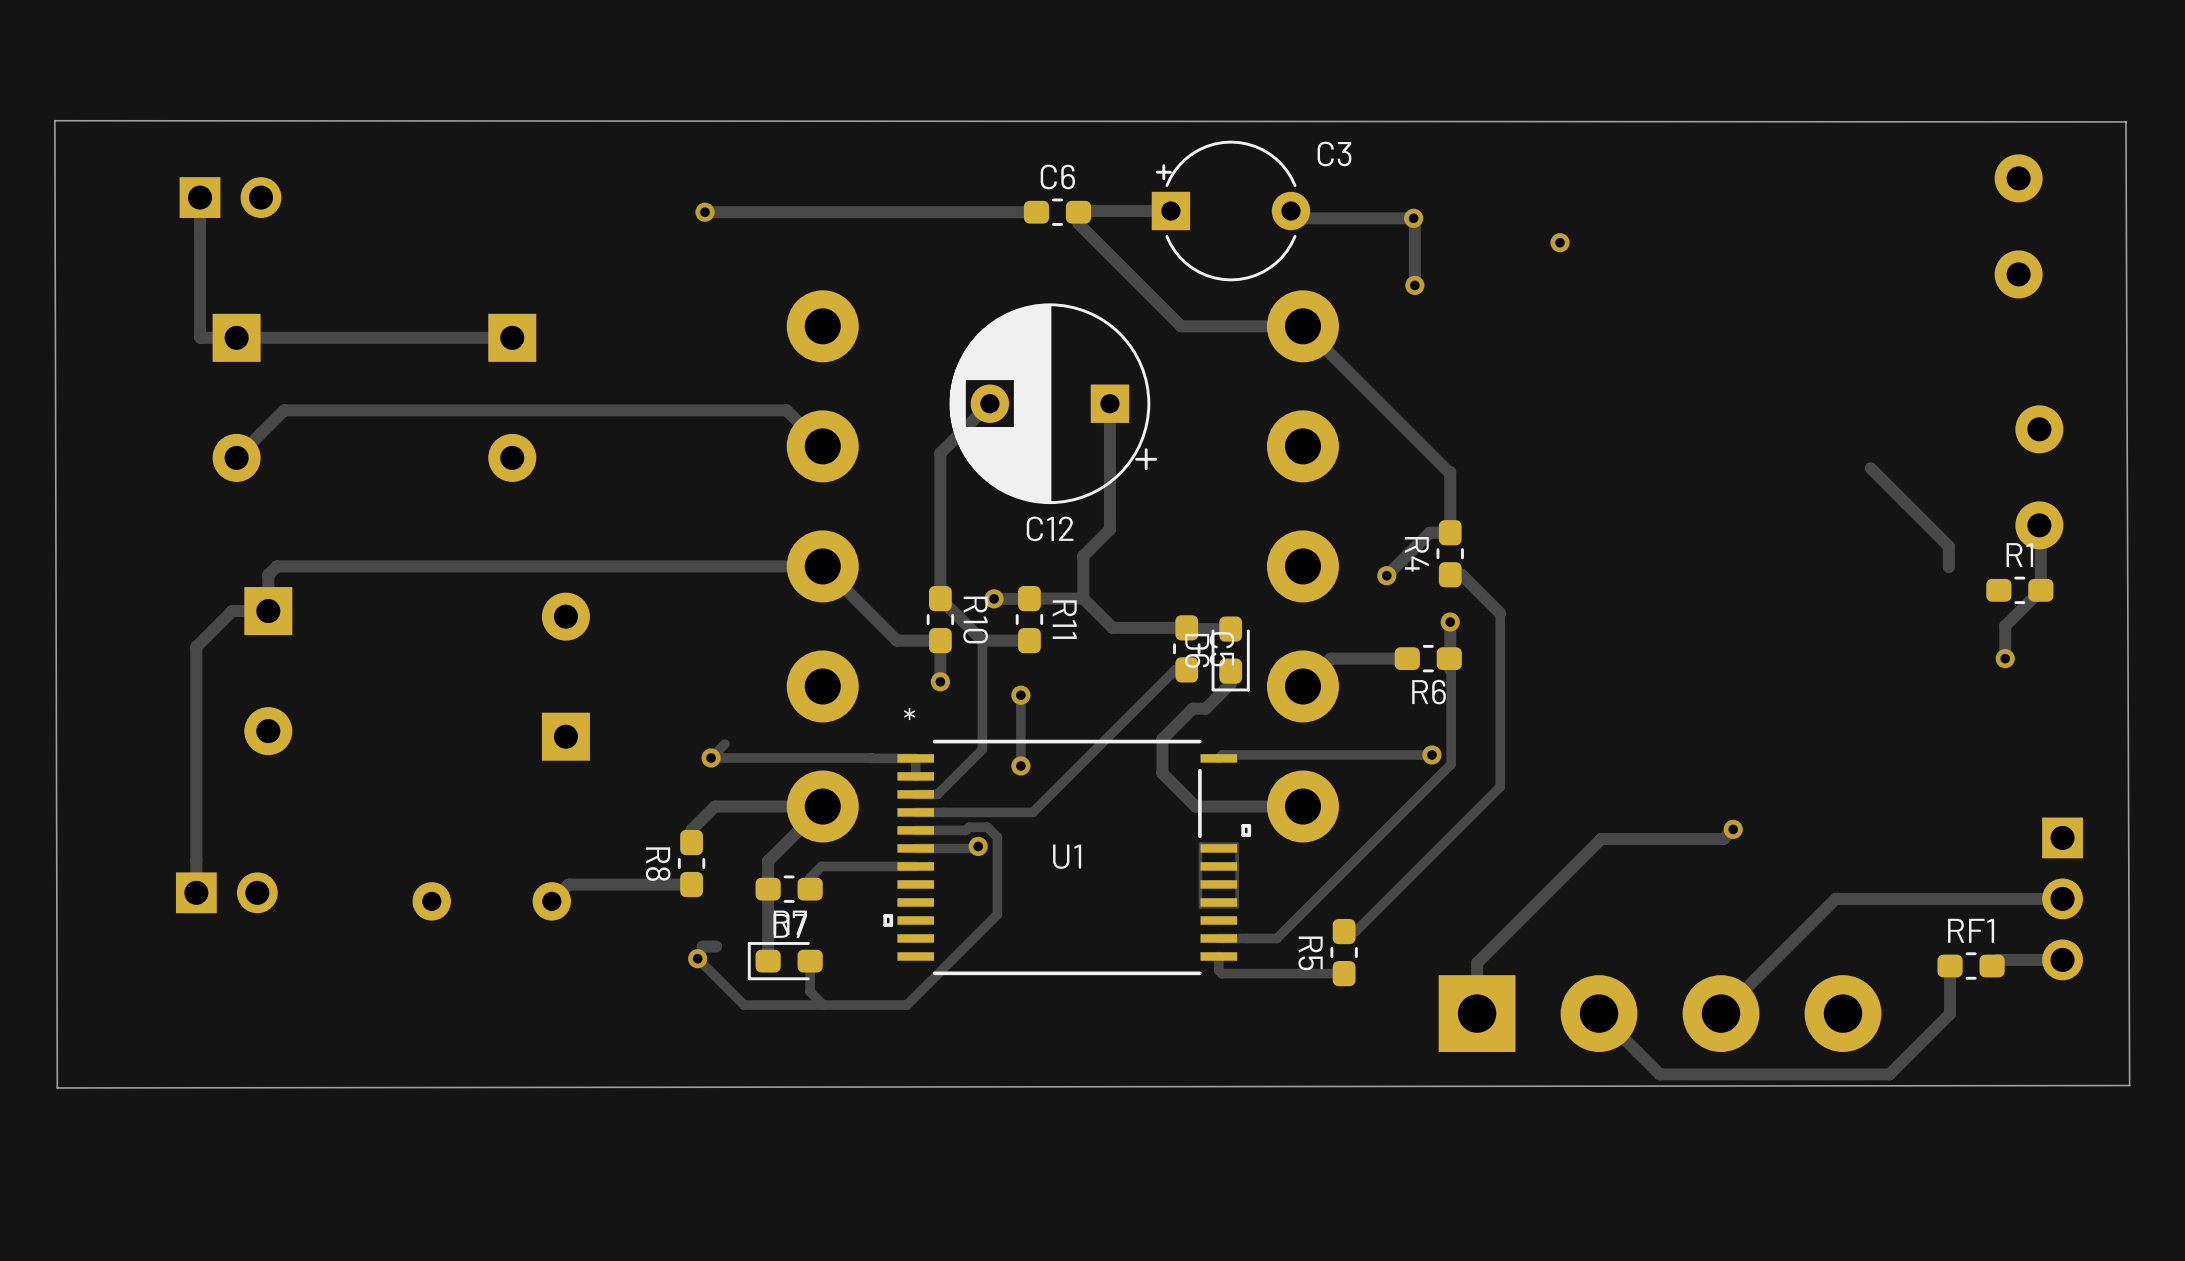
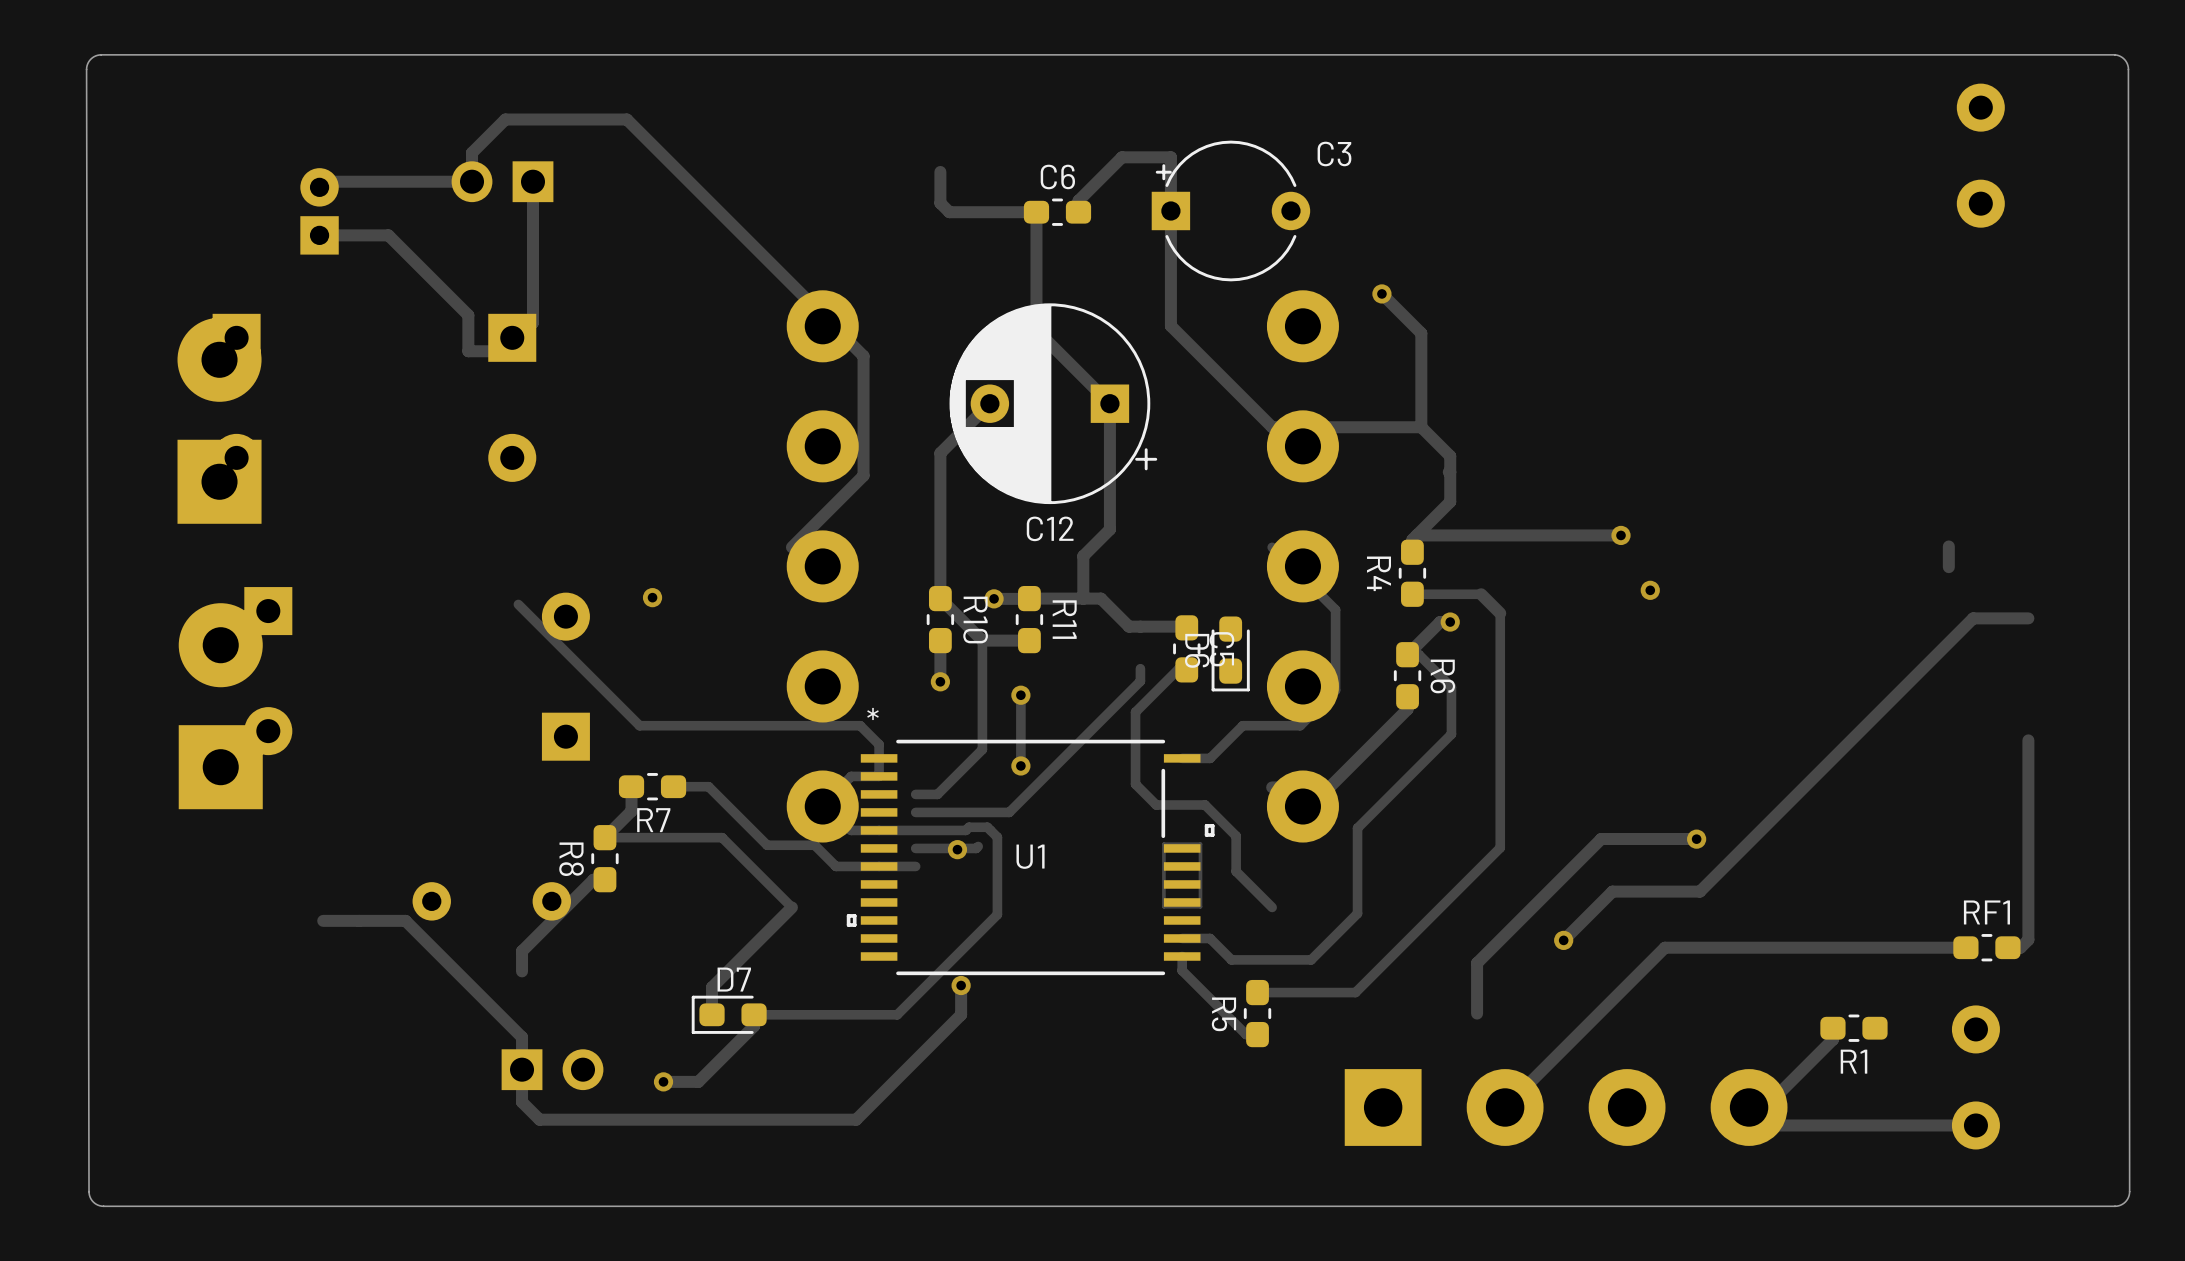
board edge: (54, 120) (57, 1087) (2129, 1085) (2125, 121) (54, 120) -> (2114, 54) (2124, 59) (2128, 69) (2129, 1191) (2127, 1198) (2122, 1204) (2114, 1206) (103, 1206) (96, 1204) (90, 1198) (89, 1191) (86, 69) (88, 62) (93, 56) (101, 54) (2114, 54)
track: none -> (533, 181) (533, 322) (504, 351) (468, 351) (468, 315) (388, 235) (319, 235)
track: none -> (319, 187) (325, 181) (472, 181) (472, 152) (505, 119) (626, 119) (863, 356) (863, 475) (791, 547)
track: (200, 197) (200, 337) (512, 337) -> none
part rotation: 0° (230, 197) -> 180° (502, 181)
part position: (230, 197) -> (502, 181)
track: (1170, 210) (1079, 210) -> none
track: (1290, 210) (1298, 218) (1413, 218) (1414, 285) -> none
part: none -> (319, 211)
via: (704, 212) -> none
track: (949, 212) (704, 212) -> (949, 212) (940, 203) (940, 171)
track: none -> (1036, 212) (1036, 330) (1109, 403)
track: (1078, 212) (1078, 223) (1181, 326) (1302, 326) (1448, 472) -> (1078, 212) (1078, 200) (1121, 157) (1170, 157) (1170, 326) (1272, 427) (1421, 427)
via: (1413, 218) -> none
part position: (2018, 226) -> (1980, 155)
via: (1560, 242) -> none
via position: (1414, 285) -> (1381, 293)
track: none -> (1381, 293) (1421, 333) (1421, 427)
part: none -> (219, 420)
track: none -> (1421, 427) (1450, 456) (1450, 472)
track: (822, 446) (786, 410) (284, 410) (236, 457) -> none
track: (1870, 468) (1948, 546) -> none
part: (2039, 477) -> none
track: (1450, 501) (1450, 532) (1429, 532) (1386, 575) -> (1450, 501) (1412, 539) (1412, 552)
track: (2039, 525) (2040, 590) (2005, 625) (2005, 658) -> none
track: none -> (1621, 535) (1416, 535)
via: none -> (1621, 535)
track: none -> (1272, 547) (1335, 609) (1335, 690) (1300, 725) (1242, 725) (1210, 758) (1182, 758)
R4 position: (1450, 553) -> (1412, 573)
R1 name position: R1 (2019, 555) -> R1 (1853, 1061)
track: (1450, 574) (1461, 574) (1481, 594) -> (1412, 594) (1481, 594)
via: (1386, 575) -> none
via: none -> (1650, 590)
R1 position: (2019, 590) -> (1853, 1028)
via: none -> (652, 597)
track: (1083, 598) (1112, 627) (1230, 629) -> (1083, 598) (1100, 598) (1129, 626) (1190, 626)
track: none -> (518, 604) (639, 725) (860, 725) (879, 744) (879, 776) (851, 776) (842, 784) (842, 822) (851, 830) (915, 830)
track: none -> (2028, 618) (1973, 618) (1699, 891) (1612, 891) (1563, 940)
track: (1450, 622) (1451, 764) (1276, 938) (1218, 938) -> (1450, 622) (1440, 622) (1407, 654) (1418, 654) (1451, 687) (1451, 734) (1357, 828) (1357, 913) (1311, 959) (1231, 959) (1210, 938) (1182, 938)
track: (940, 640) (896, 640) (822, 566) (276, 566) (268, 575) (268, 611) (232, 611) (196, 647) (196, 892) -> none
track: (1407, 658) (1330, 658) (1302, 686) -> none
R6 rotation: 0° (1428, 658) -> 90° clockwise (1407, 675)
via: (2005, 658) -> none
track: none -> (1190, 668) (1179, 668) (1135, 712) (1135, 784) (1156, 805) (1205, 805) (1236, 836) (1236, 871) (1272, 907)
track: (1186, 669) (1175, 669) (1032, 812) (1009, 812) -> (1140, 668) (1140, 681) (1009, 812)
track: (1230, 671) (1230, 683) (1205, 708) (1192, 708) (1162, 739) (1162, 773) (1195, 806) (1302, 806) -> none
R6 name position: R6 (1429, 692) -> R6 (1442, 676)
track: none -> (1407, 696) (1407, 709) (1329, 787) (1272, 787)
part: none -> (220, 706)
track: none -> (2028, 740) (2028, 939) (2020, 947) (2007, 947)
track: (725, 744) (711, 758) (915, 758) (915, 776) -> none
track: (1431, 754) (1222, 754) (1218, 758) -> none
via: (1431, 754) -> none
via: (711, 758) -> none
track: none -> (631, 786) (631, 811) (604, 837) (722, 837) (791, 907) (712, 987) (712, 1014)
track: (1500, 786) (1355, 931) (1344, 931) -> (1500, 786) (1500, 847) (1355, 992) (1257, 992)
track: (1733, 829) (1723, 839) (1696, 839) -> none
via position: (1733, 829) -> (1696, 839)
track: (691, 842) (691, 829) (714, 806) (822, 806) (768, 861) (768, 961) -> none
via position: (978, 846) -> (957, 849)
U1 position: (1067, 857) -> (1030, 857)
R8 position: (691, 863) -> (604, 858)
track: (835, 866) (821, 866) (810, 877) (810, 889) -> (835, 866) (814, 845) (767, 845) (708, 786) (673, 786)
track: none -> (604, 879) (593, 879) (522, 951) (522, 971)
track: (691, 884) (568, 884) (551, 901) -> none
R7 position: (789, 889) -> (652, 786)
part position: (226, 892) -> (552, 1069)
track: (2062, 898) (1835, 898) (1721, 1013) -> none
part: (2062, 898) -> none
track: none -> (323, 920) (405, 920) (522, 1037) (522, 1102) (539, 1119) (856, 1119) (961, 1014) (961, 985)
via: none -> (1563, 940)
track: (716, 946) (702, 946) -> none
track: none -> (1965, 947) (1664, 947) (1505, 1107)
R5 position: (1344, 952) -> (1257, 1013)
track: none -> (1182, 956) (1182, 970) (1246, 1034) (1257, 1034)
track: (1218, 956) (1218, 970) (1222, 973) (1344, 973) -> none
track: (697, 958) (744, 1005) (907, 1005) -> (663, 1081) (698, 1081) (754, 1026) (754, 1014) (897, 1014) (907, 1005)
via position: (697, 958) -> (663, 1081)
track: (2062, 959) (1998, 959) (1992, 966) -> none
D7 position: (785, 961) -> (729, 1014)
track: (810, 961) (810, 991) (823, 1005) -> none
track: (1950, 966) (1950, 1013) (1889, 1074) (1659, 1074) (1599, 1013) -> none
RF1 position: (1971, 966) -> (1986, 947)
via: none -> (961, 985)
part position: (1660, 1013) -> (1566, 1107)
track: none -> (1832, 1028) (1832, 1039) (1765, 1107) (1749, 1107) (1767, 1125) (1975, 1125)
part: none -> (1975, 1077)

